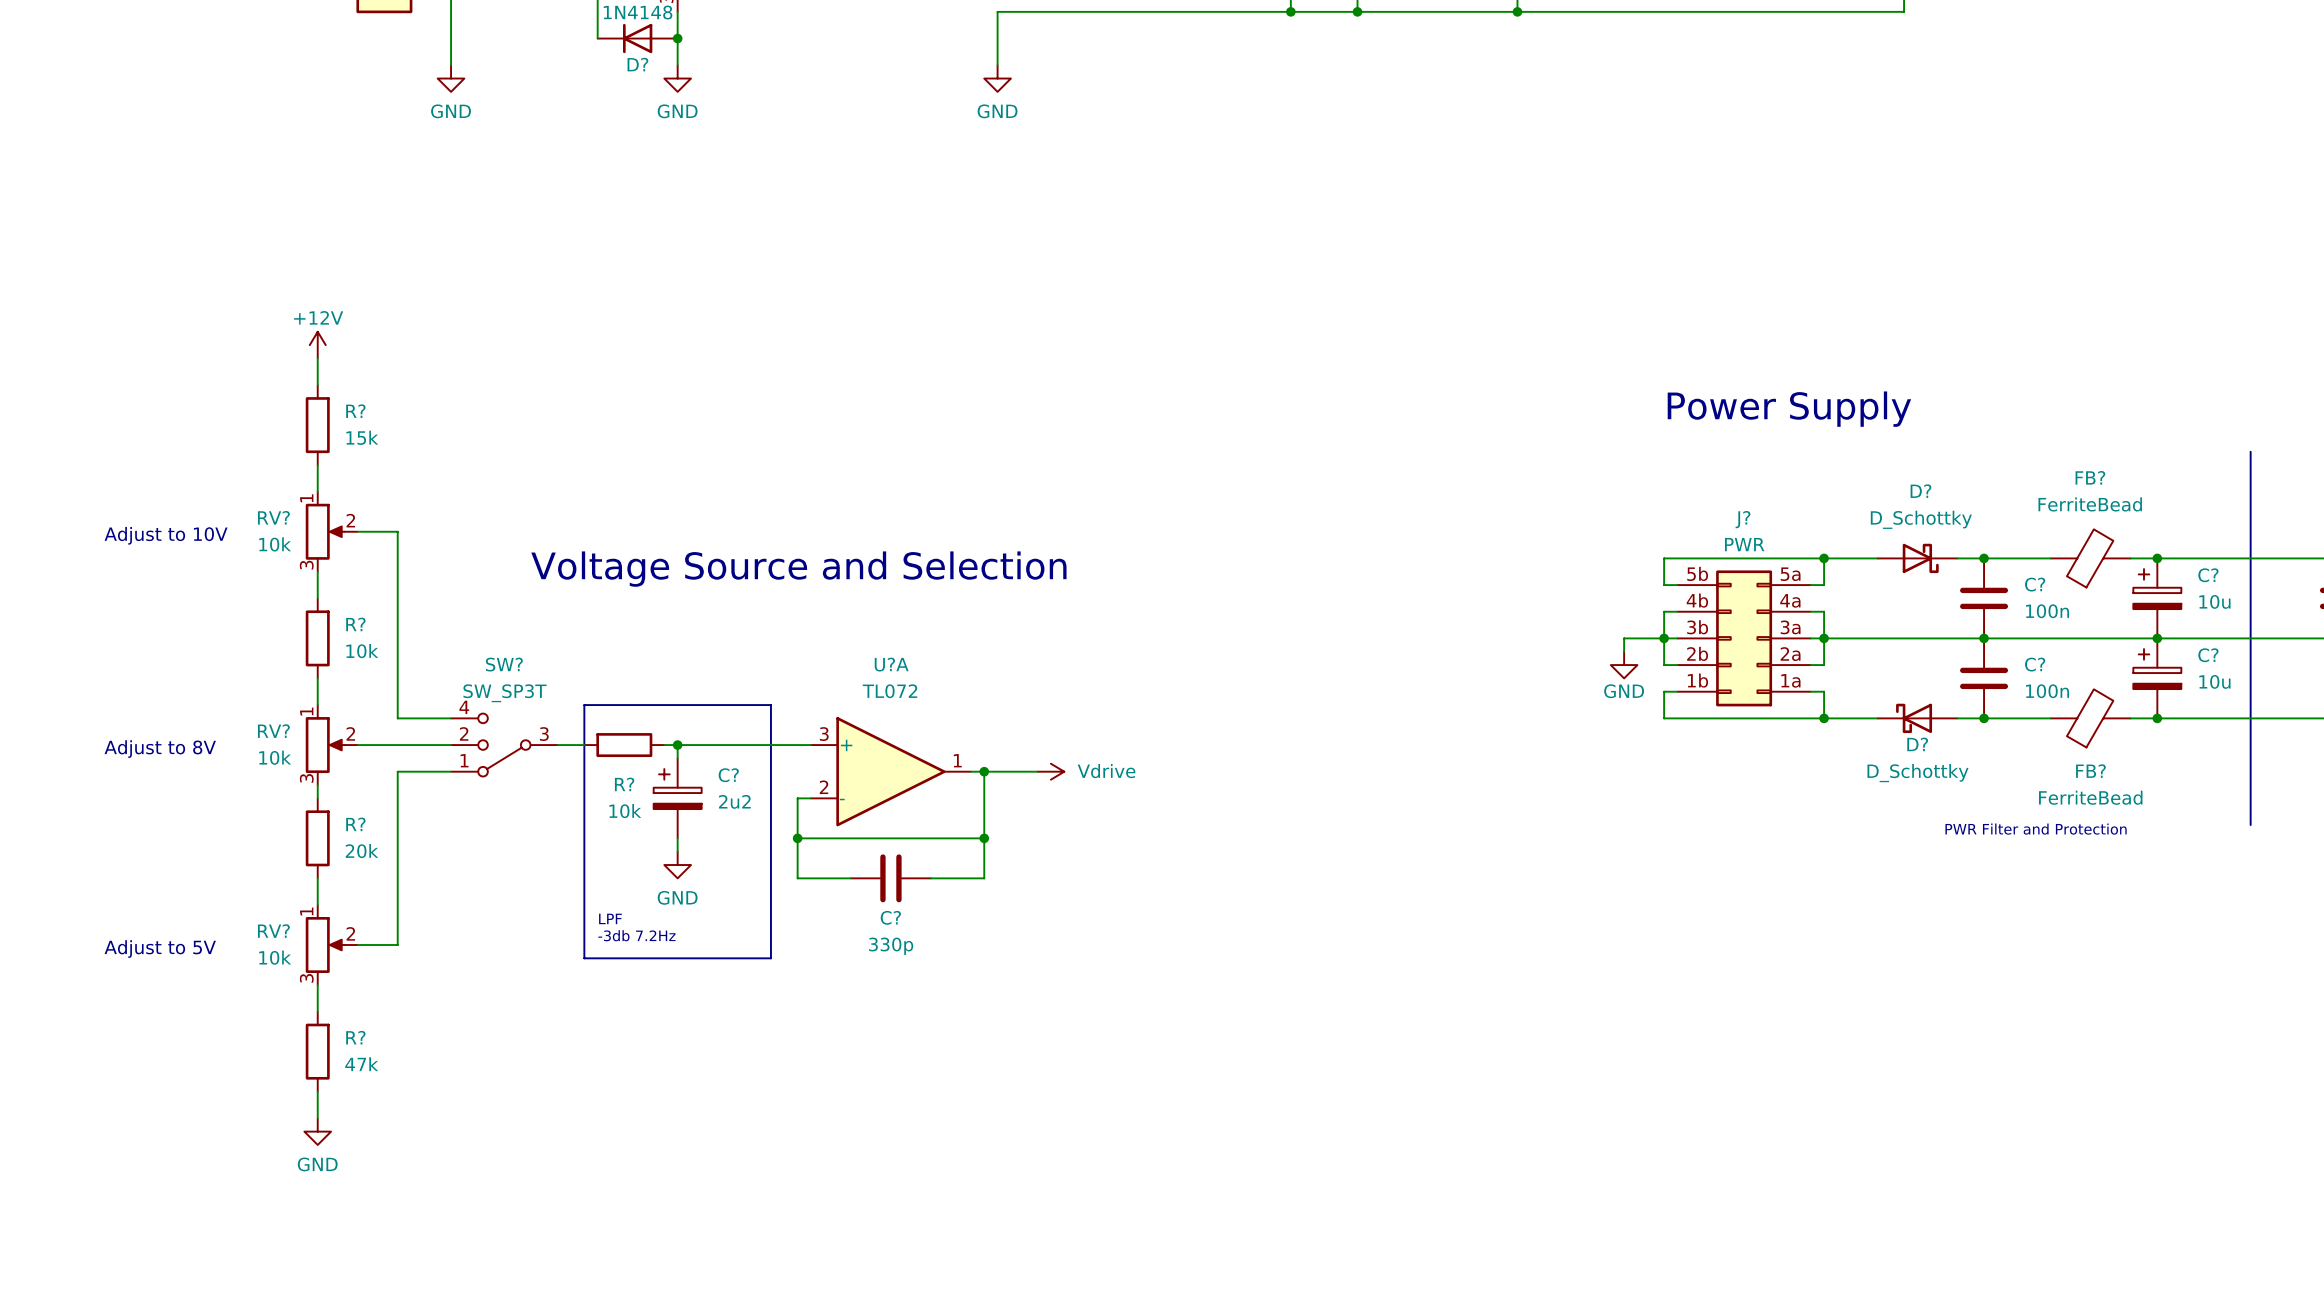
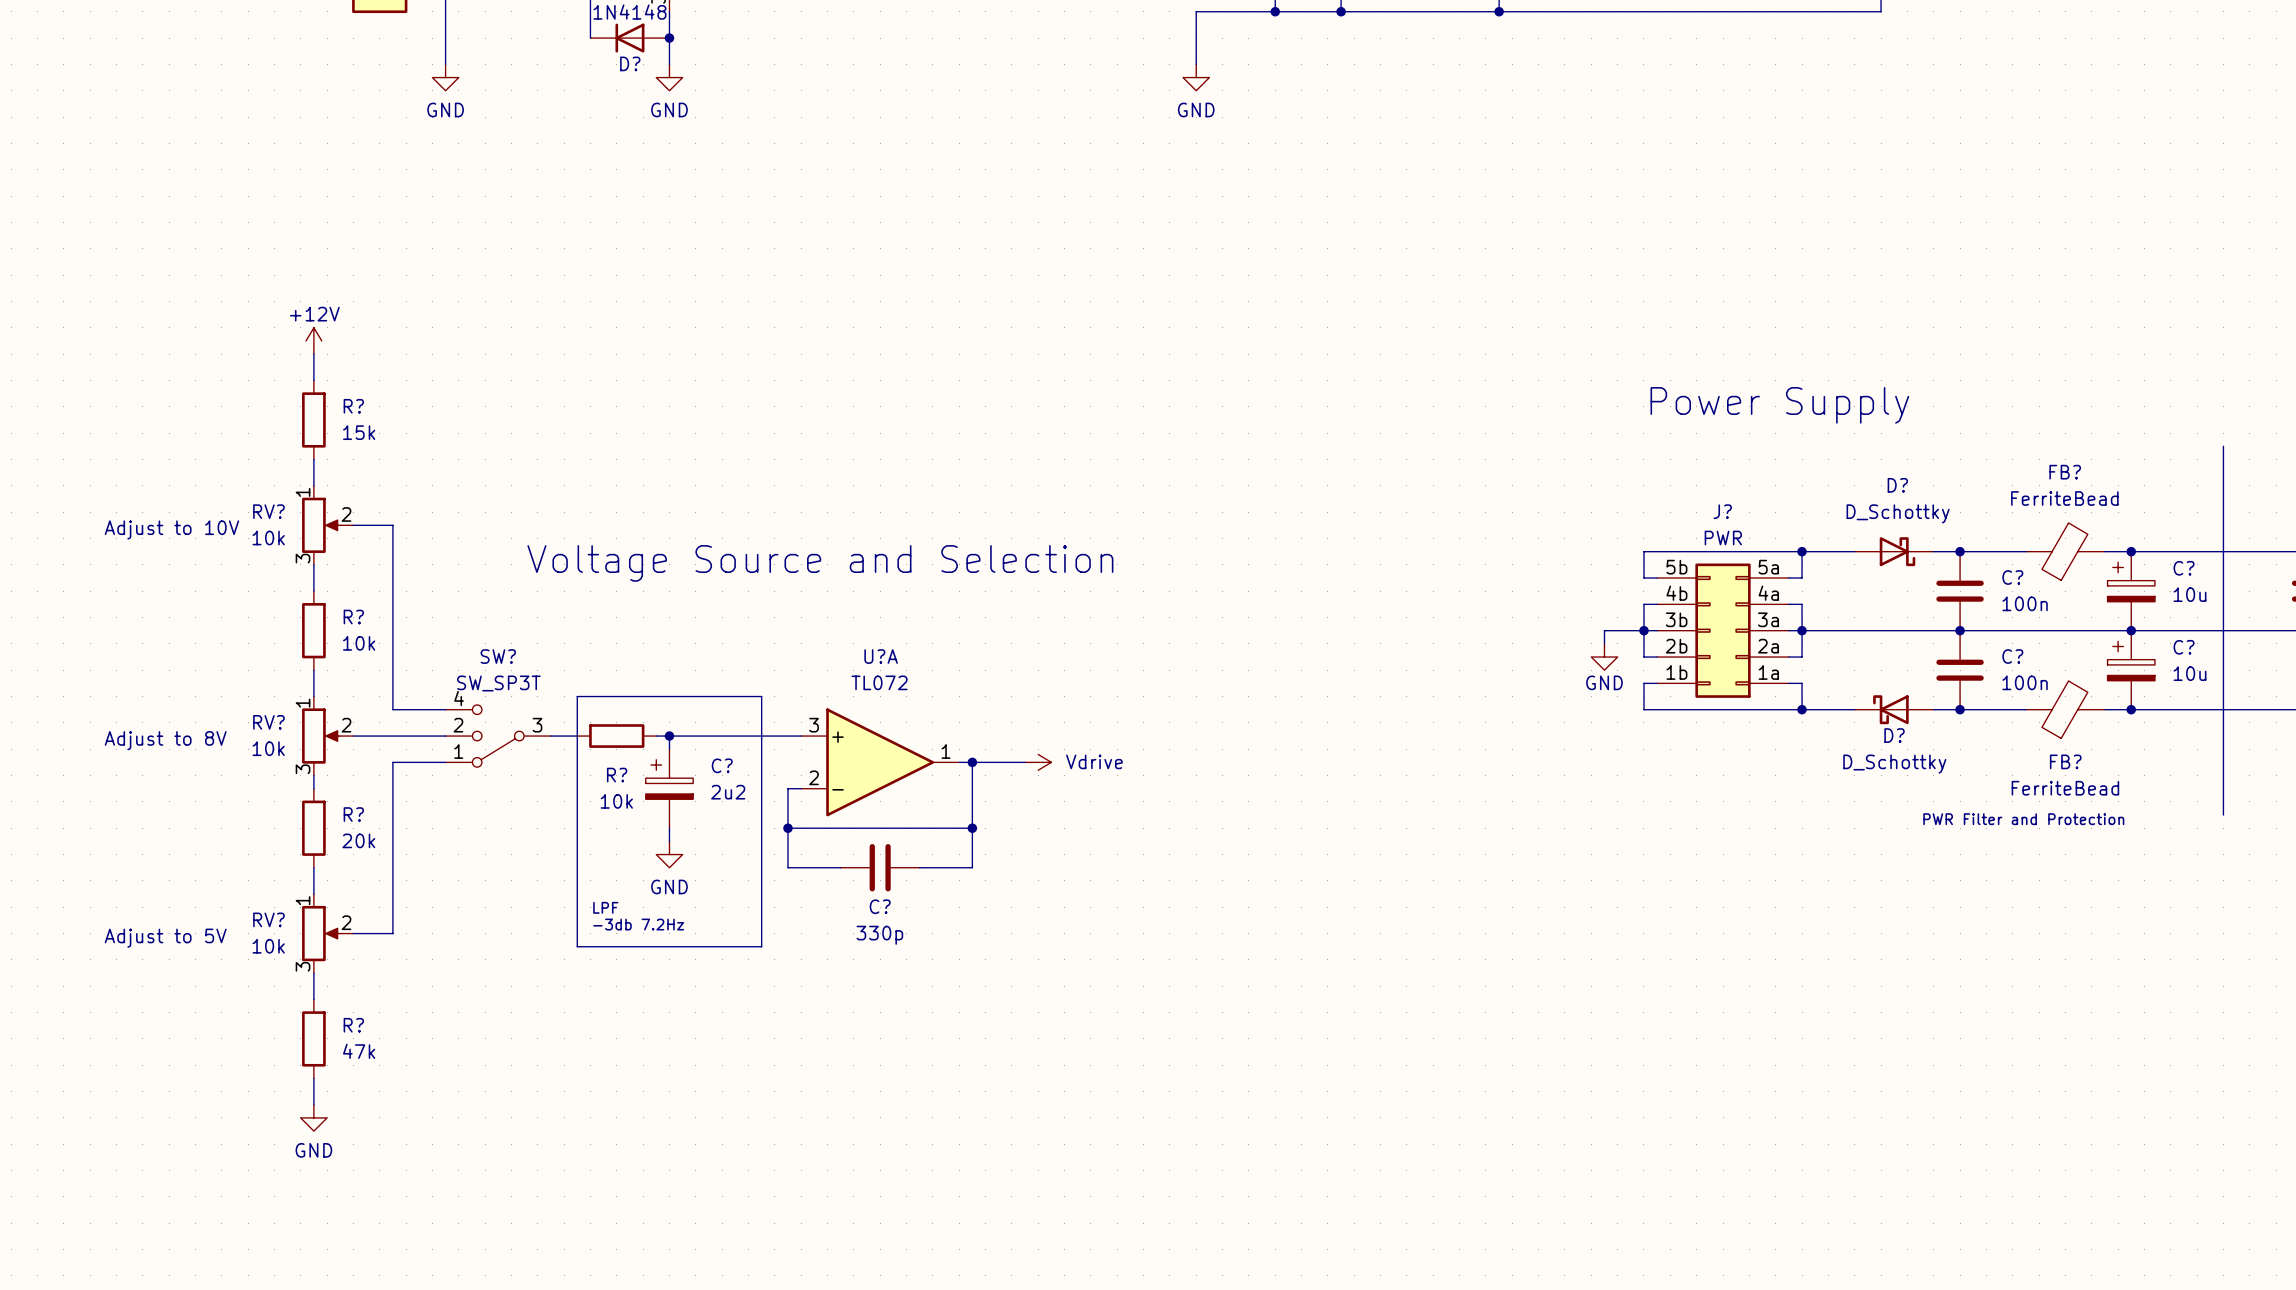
wire: (1210, 11) (997, 11) (997, 65) -> (1196, 11) (1196, 64)
power symbol position: GND (997, 78) -> GND (1196, 77)

